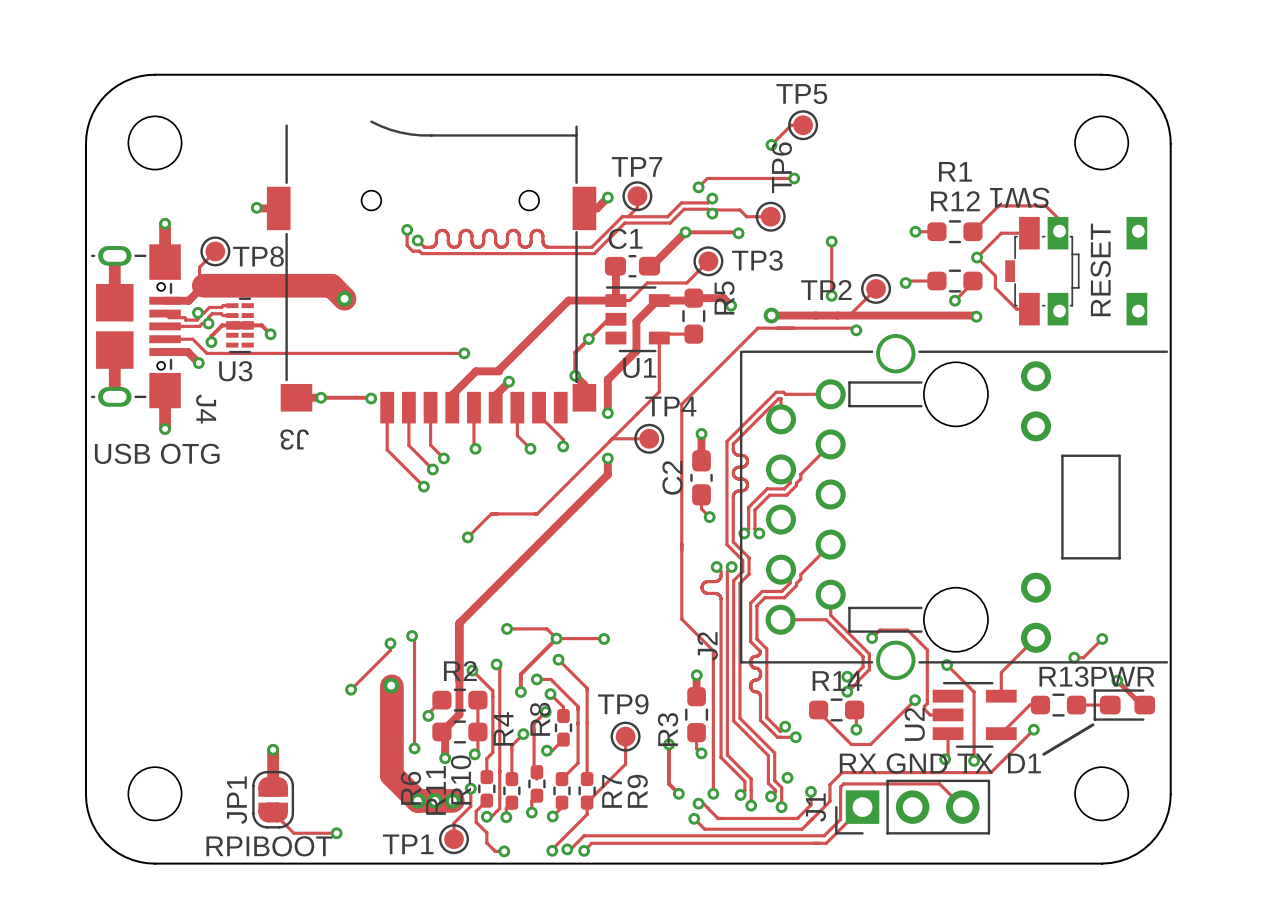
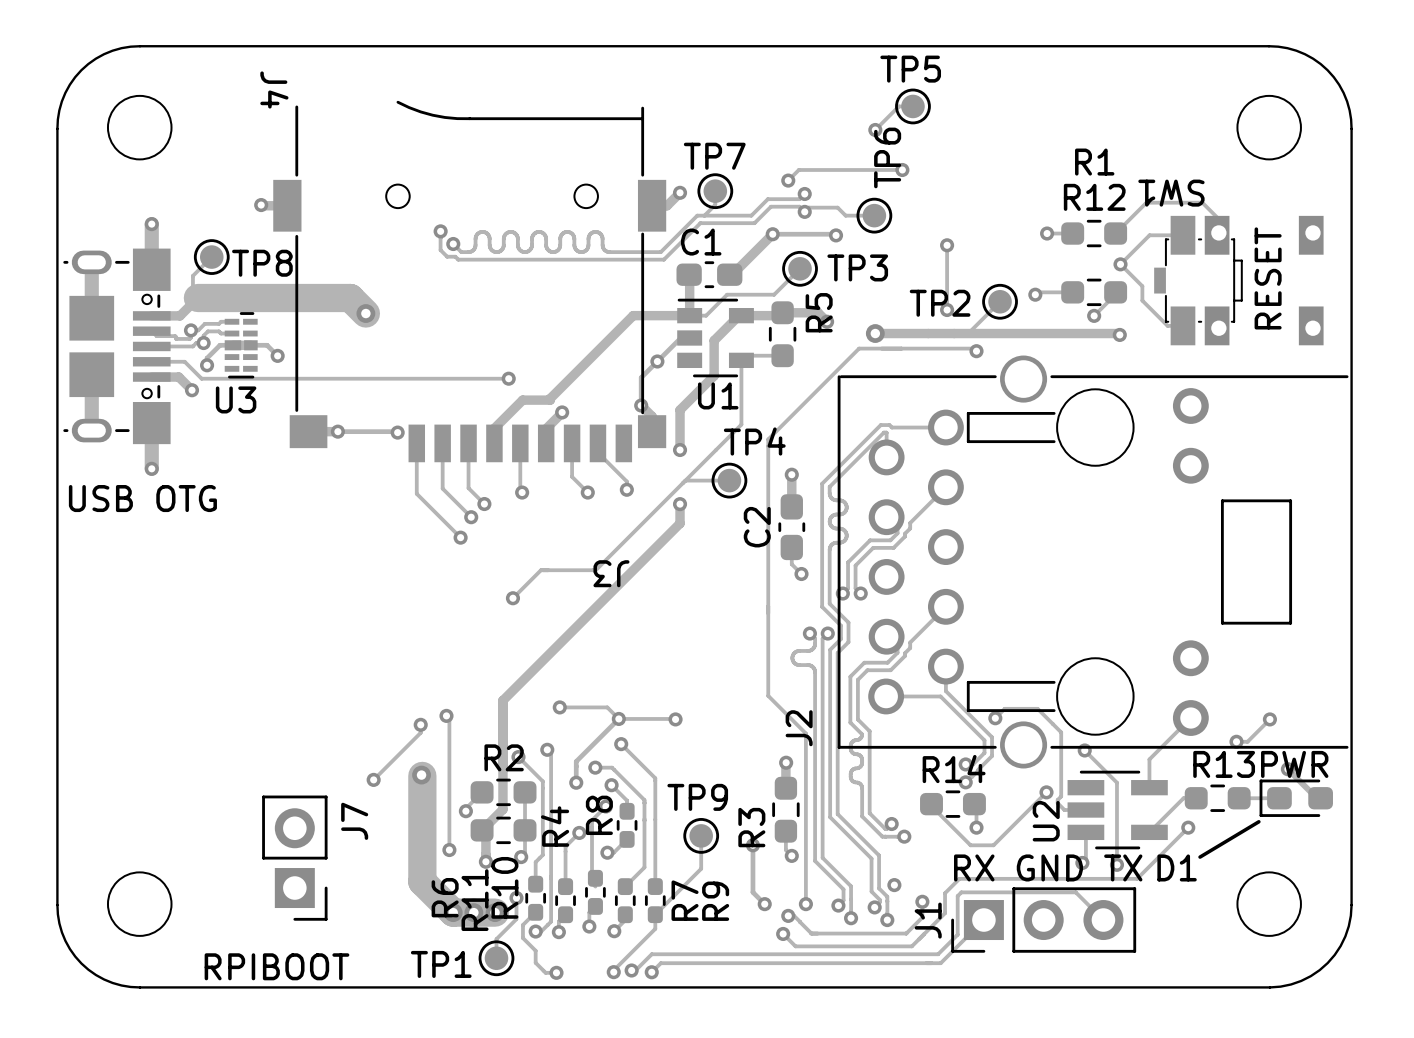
J4 name position: J4 (206, 409) -> J4 (274, 89)
J3 name position: J3 (294, 439) -> J3 (611, 573)
track: (273, 749) (273, 786) -> none
via: (273, 749) -> none
J7: none -> (294, 858)
JP1: (273, 799) -> none
track: (273, 812) (293, 833) (336, 833) -> none
via: (336, 833) -> none

